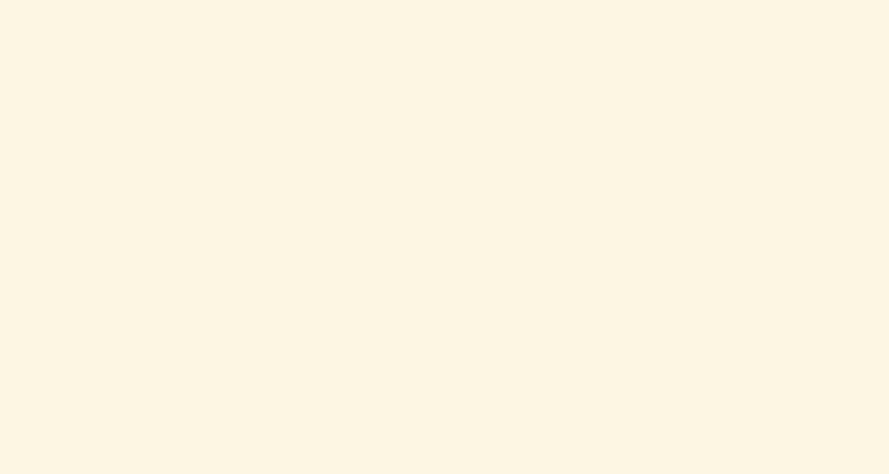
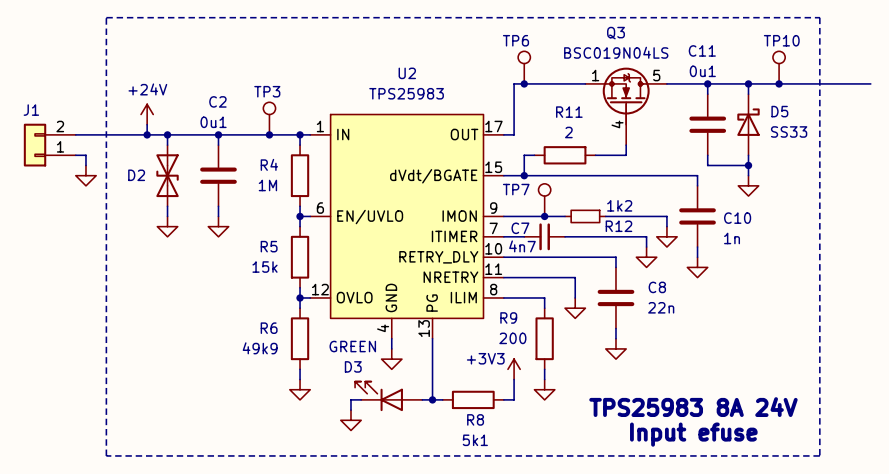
line: none -> (106, 17) (819, 17) (819, 455) (106, 455) (106, 17)
TP6: none -> (524, 67)
TP10: none -> (779, 67)
junction: none -> (524, 83)
wire: none -> (585, 83) (514, 83) (514, 134) (503, 134)
wire: none -> (666, 83) (870, 83)
wire: none -> (707, 83) (707, 94)
junction: none -> (707, 83)
wire: none -> (748, 83) (748, 94)
junction: none -> (748, 83)
junction: none -> (779, 83)
Q3: none -> BSC019N04LS (626, 106)
power symbol: none -> +24V (147, 114)
TP3: none -> (269, 118)
wire: none -> (147, 124) (147, 134)
C11: none -> 0u1 (707, 124)
D5: none -> SS33 (748, 124)
wire: none -> (75, 134) (310, 134)
junction: none -> (147, 134)
wire: none -> (167, 134) (167, 145)
junction: none -> (167, 134)
wire: none -> (218, 134) (218, 145)
junction: none -> (218, 134)
junction: none -> (269, 134)
wire: none -> (300, 134) (300, 145)
junction: none -> (300, 134)
J1: none -> (49, 145)
wire: none -> (626, 145) (626, 155) (595, 155)
wire: none -> (75, 155) (85, 155) (85, 165)
wire: none -> (534, 155) (524, 155) (524, 175)
R11: none -> 2 (565, 155)
wire: none -> (707, 155) (707, 165) (748, 165)
wire: none -> (748, 155) (748, 175)
junction: none -> (748, 165)
power symbol: none -> (85, 175)
D2: none -> (167, 175)
C2: none -> 0u1 (218, 175)
R4: none -> 1M (300, 175)
wire: none -> (503, 175) (697, 175) (697, 185)
junction: none -> (524, 175)
power symbol: none -> (748, 185)
TP7: none -> (544, 200)
wire: none -> (167, 206) (167, 216)
wire: none -> (218, 206) (218, 216)
wire: none -> (300, 206) (300, 226)
wire: none -> (300, 216) (310, 216)
junction: none -> (300, 216)
wire: none -> (503, 216) (565, 216)
junction: none -> (544, 216)
R12: none -> 1k2 (585, 216)
wire: none -> (605, 216) (666, 216) (666, 226)
C10: none -> 1n (697, 216)
power symbol: none -> (167, 226)
power symbol: none -> (218, 226)
U2: none -> TPS25983 (407, 226)
wire: none -> (503, 236) (524, 236)
C7: none -> 4n7 (544, 236)
wire: none -> (565, 236) (646, 236) (646, 247)
power symbol: none -> (666, 236)
wire: none -> (697, 247) (697, 257)
R5: none -> 15k (300, 257)
wire: none -> (503, 257) (615, 257) (615, 267)
power symbol: none -> (646, 257)
power symbol: none -> (697, 267)
wire: none -> (503, 277) (575, 277) (575, 297)
wire: none -> (300, 287) (300, 308)
wire: none -> (300, 297) (310, 297)
junction: none -> (300, 297)
wire: none -> (503, 297) (544, 297) (544, 308)
C8: none -> 22n (615, 297)
power symbol: none -> (575, 308)
wire: none -> (615, 328) (615, 338)
R6: none -> 49k9 (300, 338)
wire: none -> (391, 338) (391, 348)
wire: none -> (432, 338) (432, 399)
R9: none -> 200 (544, 338)
power symbol: none -> (615, 348)
power symbol: none -> (391, 359)
wire: none -> (300, 369) (300, 379)
power symbol: none -> +3V3 (514, 369)
wire: none -> (544, 369) (544, 379)
wire: none -> (514, 379) (514, 399) (503, 399)
power symbol: none -> (300, 389)
power symbol: none -> (544, 389)
D3: none -> GREEN (388, 396)
wire: none -> (361, 399) (350, 399) (350, 410)
wire: none -> (422, 399) (442, 399)
junction: none -> (432, 399)
R8: none -> 5k1 (473, 399)
text: none -> TPS25983 8A 24V (693, 407)
power symbol: none -> (350, 420)
text: none -> Input efuse (693, 434)

